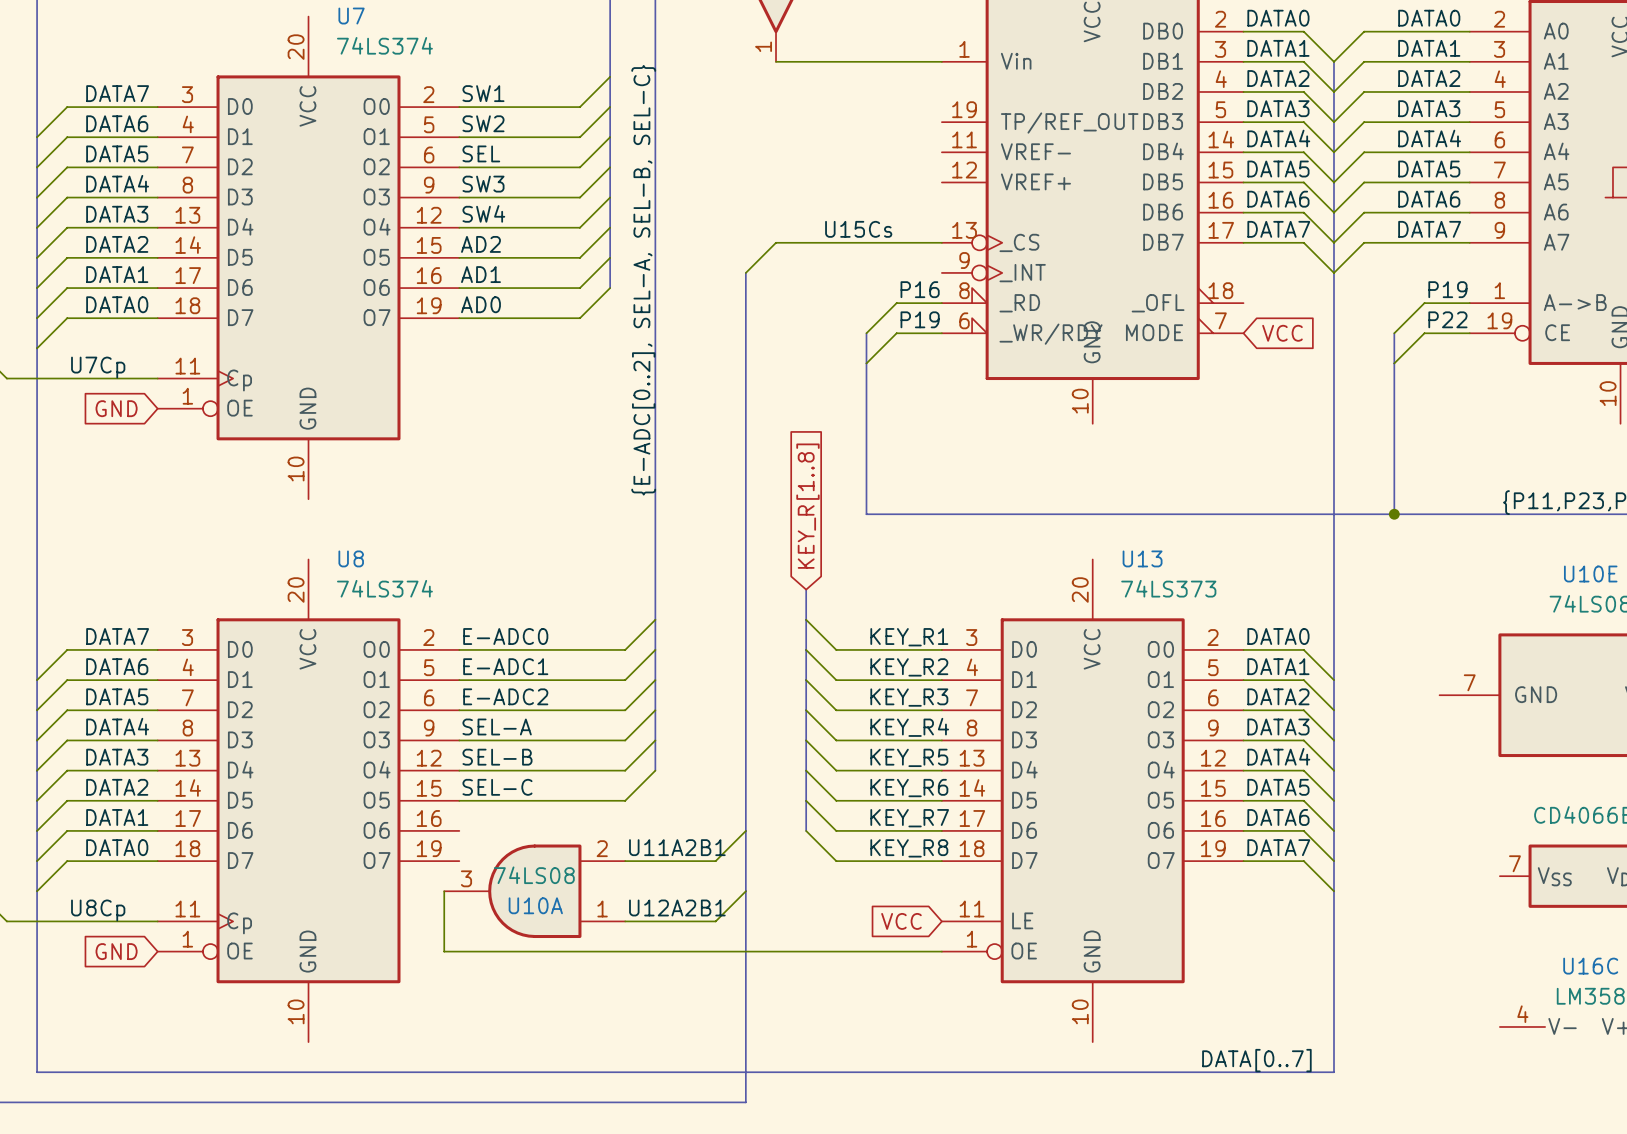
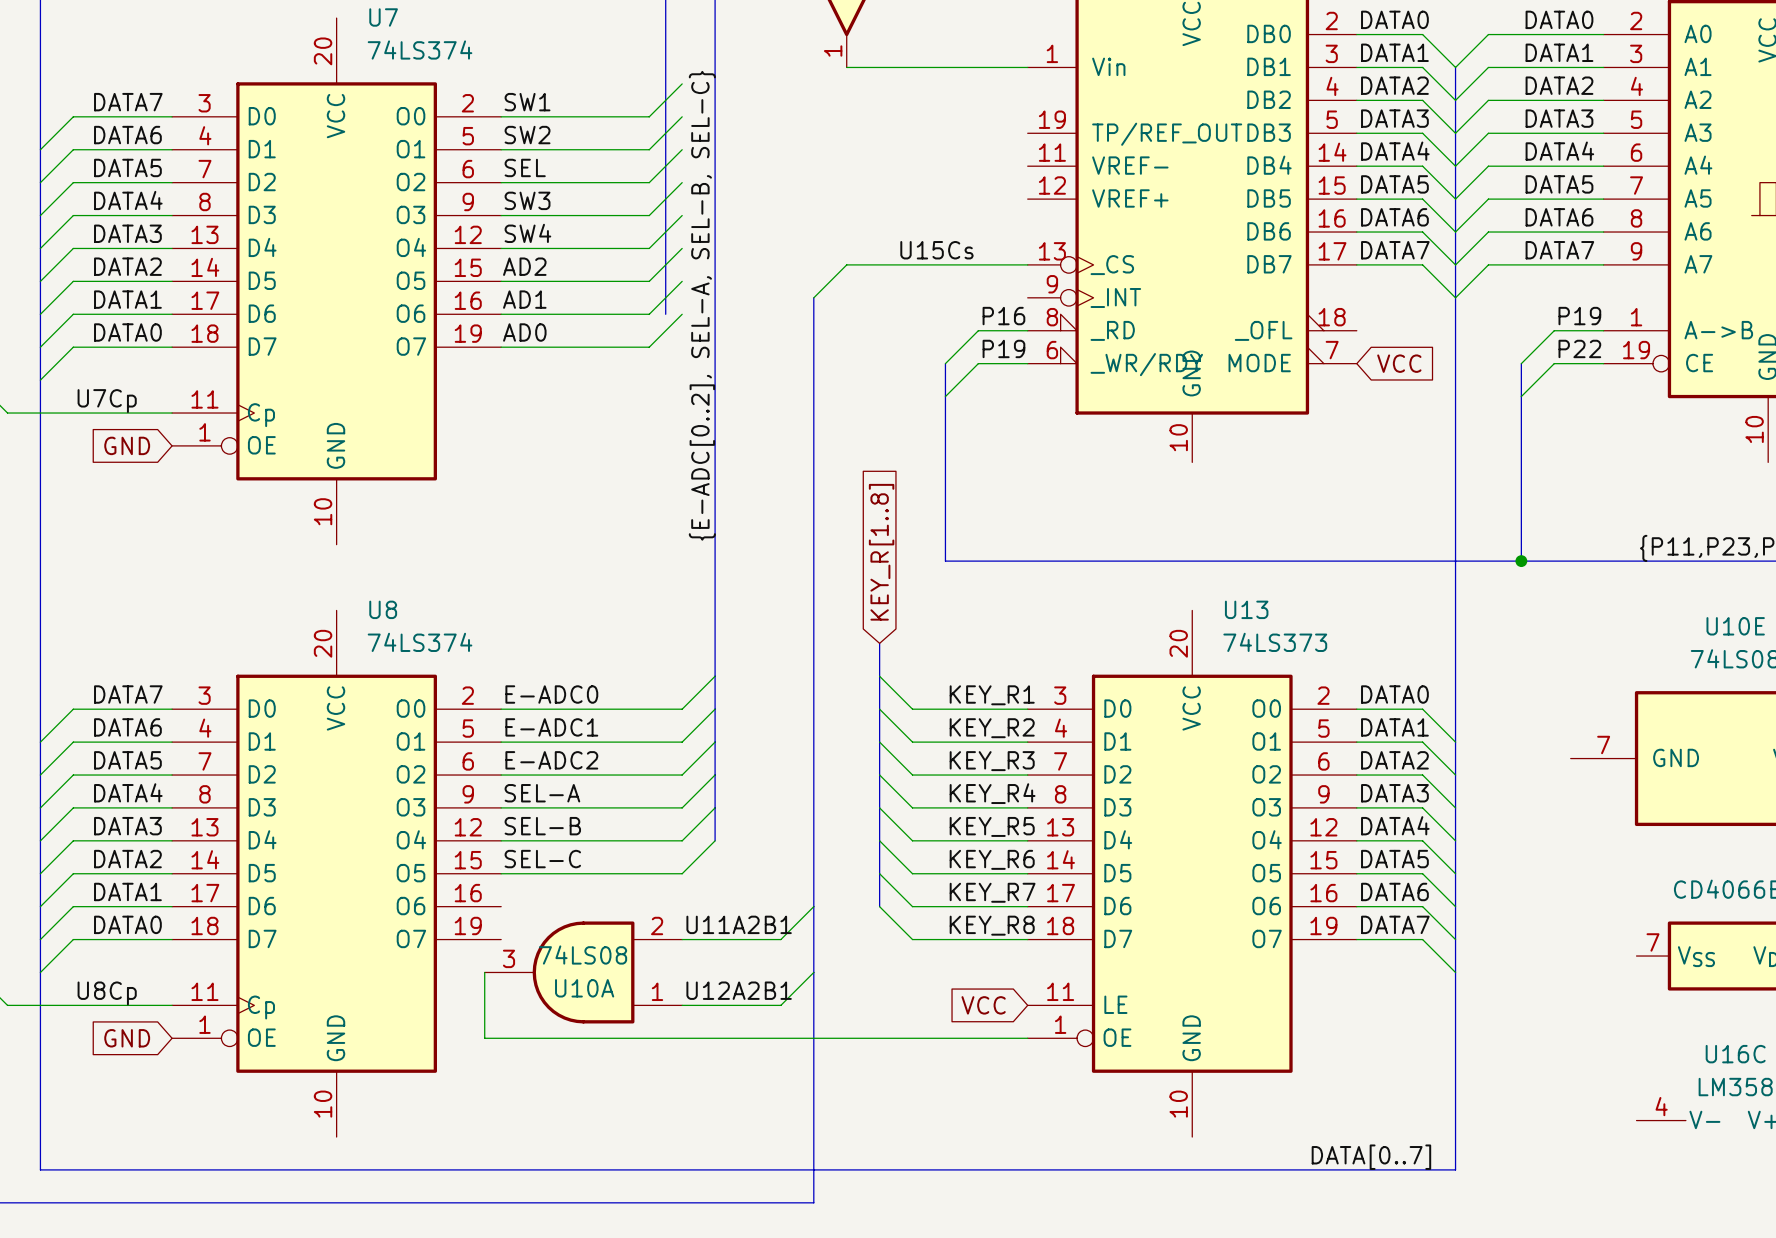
wire: (610, 76) (579, 107) -> (682, 83) (649, 116) (632, 116)
wire: (610, 107) (579, 137) -> (682, 116) (649, 149) (632, 149)
wire: (610, 137) (579, 167) -> (682, 149) (649, 182) (632, 182)
wire: (610, 167) (579, 197) -> (682, 182) (649, 215) (632, 215)
wire: (610, 197) (579, 227) -> (682, 215) (649, 248) (632, 248)
wire: (610, 227) (579, 257) -> (682, 248) (649, 281) (632, 281)
wire: (610, 257) (579, 288) -> (682, 281) (649, 314) (632, 314)
wire: (610, 288) (579, 318) -> (682, 314) (649, 347) (632, 347)

